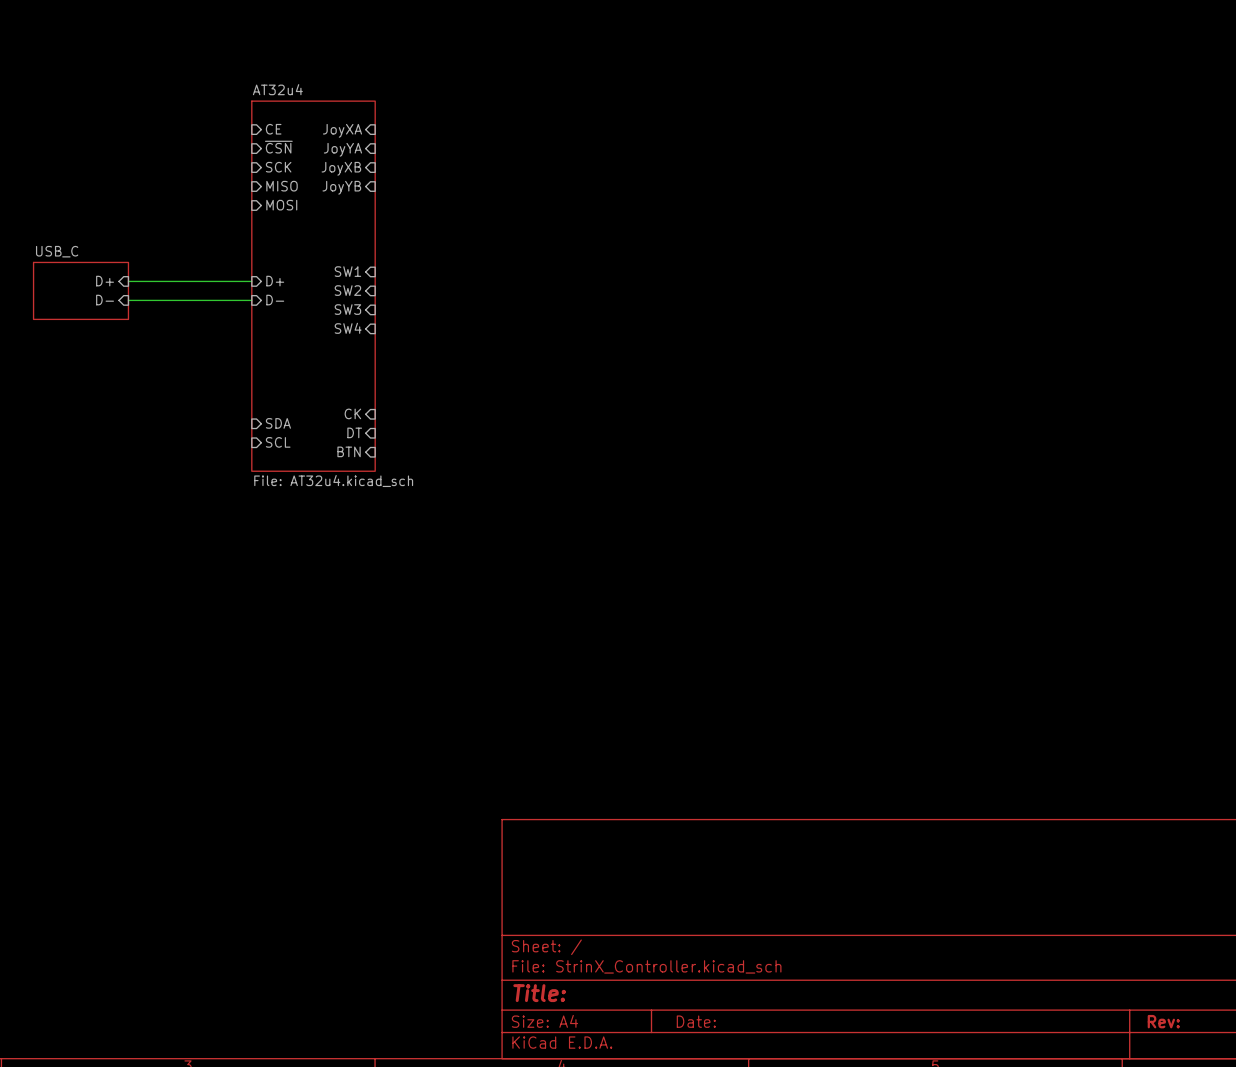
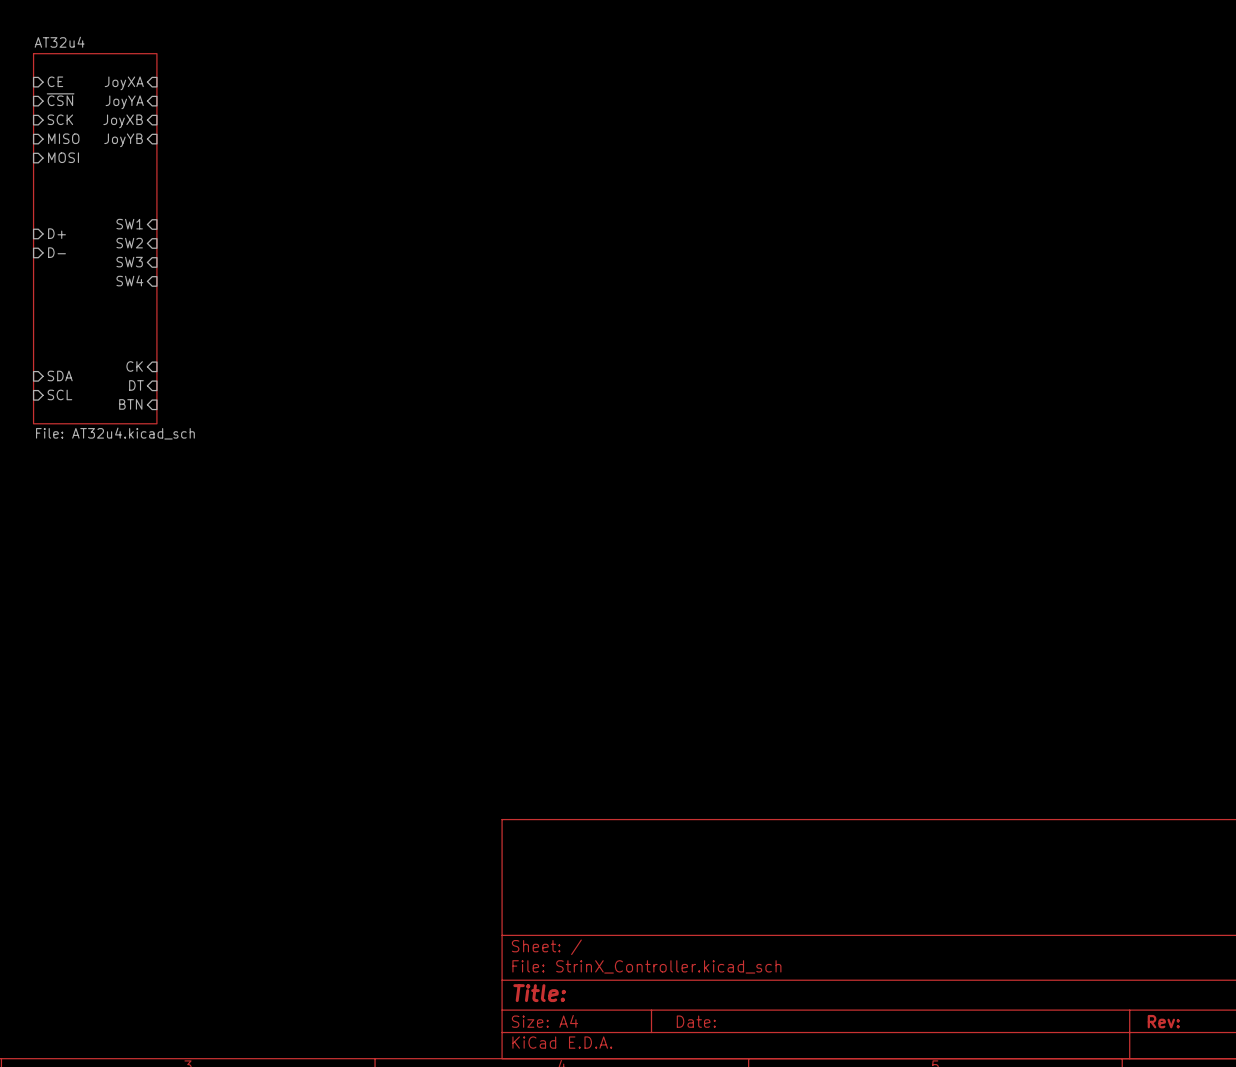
sheet pin: none -> CE (55, 81)
sheet pin: none -> JoyXA (124, 83)
sheet pin: none -> ~{CSN} (60, 99)
sheet pin: none -> JoyYA (124, 102)
sheet pin: none -> SCK (60, 119)
sheet pin: none -> JoyXB (123, 121)
sheet pin: CE (273, 129) -> none
sheet pin: JoyXA (342, 130) -> none
sheet pin: none -> MISO (63, 138)
sheet pin: none -> JoyYB (123, 140)
sheet pin: ~{CSN} (278, 147) -> none
sheet pin: JoyYA (342, 149) -> none
sheet pin: none -> MOSI (63, 157)
sheet pin: SCK (278, 167) -> none
sheet pin: JoyXB (341, 168) -> none
sheet pin: MISO (282, 186) -> none
sheet pin: JoyYB (341, 187) -> none
sheet pin: MOSI (281, 205) -> none
sheet pin: none -> SW1 (129, 224)
sheet pin: none -> SW2 (129, 243)
sheet pin: none -> SW3 (129, 262)
sheet pin: SW1 (347, 271) -> none
sheet pin: none -> SW4 (129, 280)
sheet pin rotation: 0° (105, 281) -> 180° (56, 233)
sheet pin position: D+ (105, 281) -> D+ (56, 233)
wire: (128, 281) (251, 281) -> none
sheet pin: D+ (275, 281) -> none
sheet AT32u4 position: (313, 286) -> (95, 238)
sheet USB_C: (81, 290) -> none
sheet pin: SW2 (347, 290) -> none
sheet pin rotation: 0° (105, 300) -> 180° (56, 252)
sheet pin position: D- (105, 300) -> D- (56, 252)
wire: (128, 300) (251, 300) -> none
sheet pin: D- (275, 300) -> none
sheet pin: SW3 (347, 309) -> none
sheet pin: SW4 (348, 328) -> none
sheet pin: none -> CK (134, 366)
sheet pin: none -> SDA (60, 375)
sheet pin: none -> DT (136, 385)
sheet pin: none -> SCL (59, 394)
sheet pin: none -> BTN (130, 404)
sheet pin: CK (352, 413) -> none
sheet pin: SDA (278, 423) -> none
sheet pin: DT (354, 432) -> none
sheet pin: SCL (278, 442) -> none
sheet pin: BTN (349, 451) -> none

